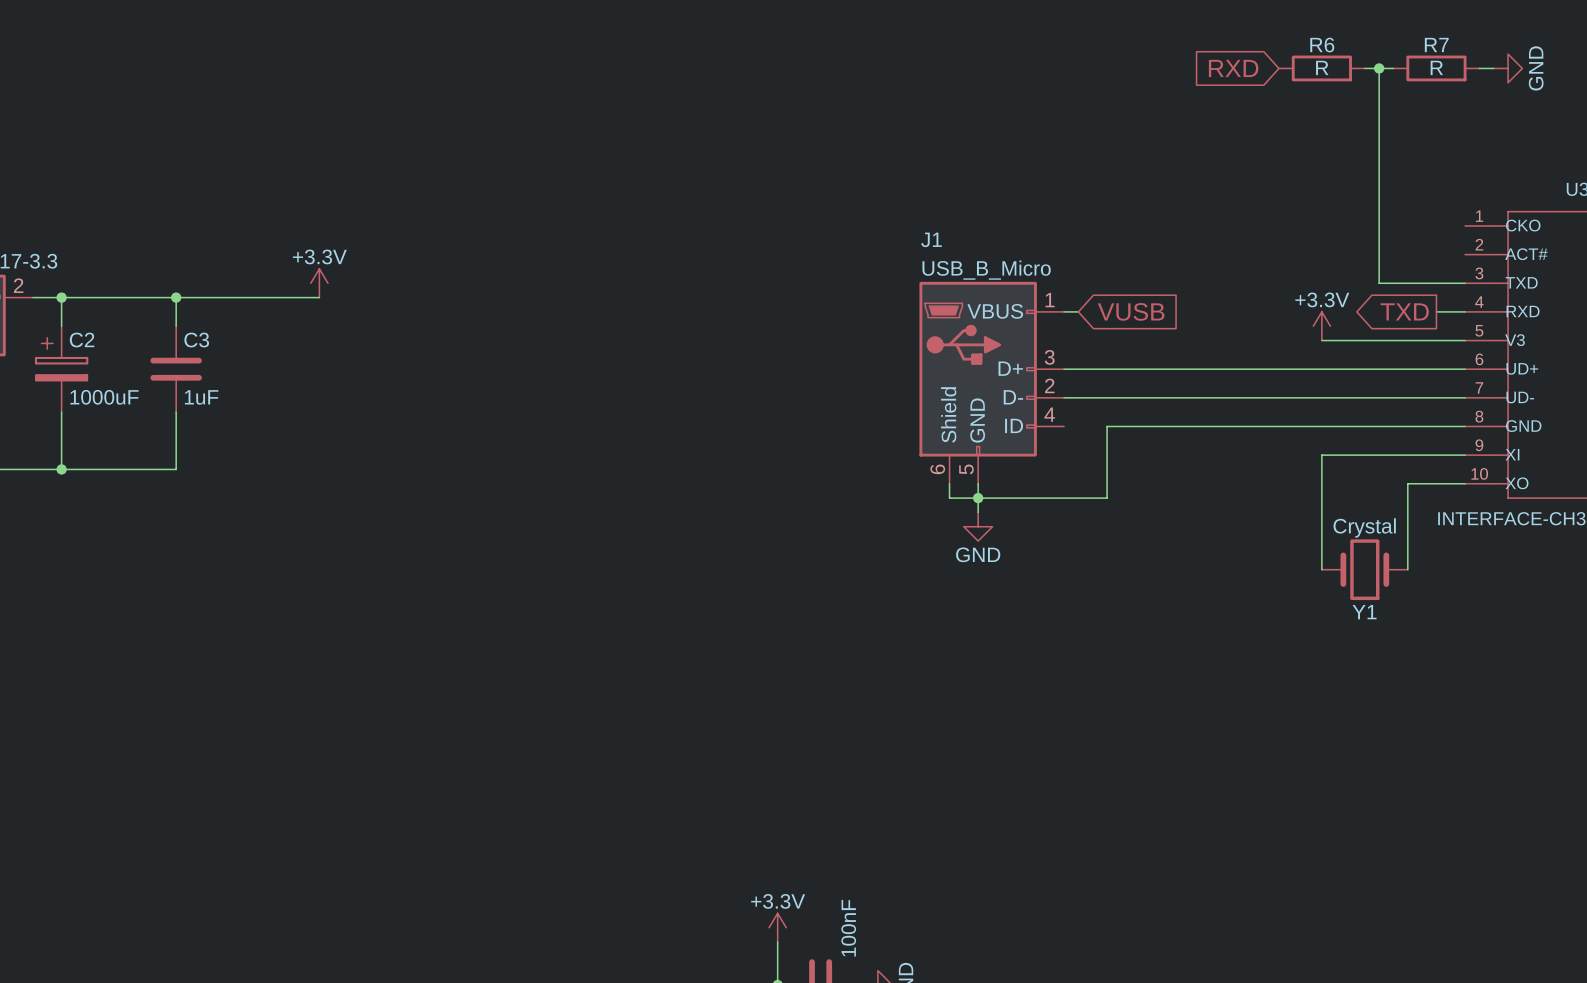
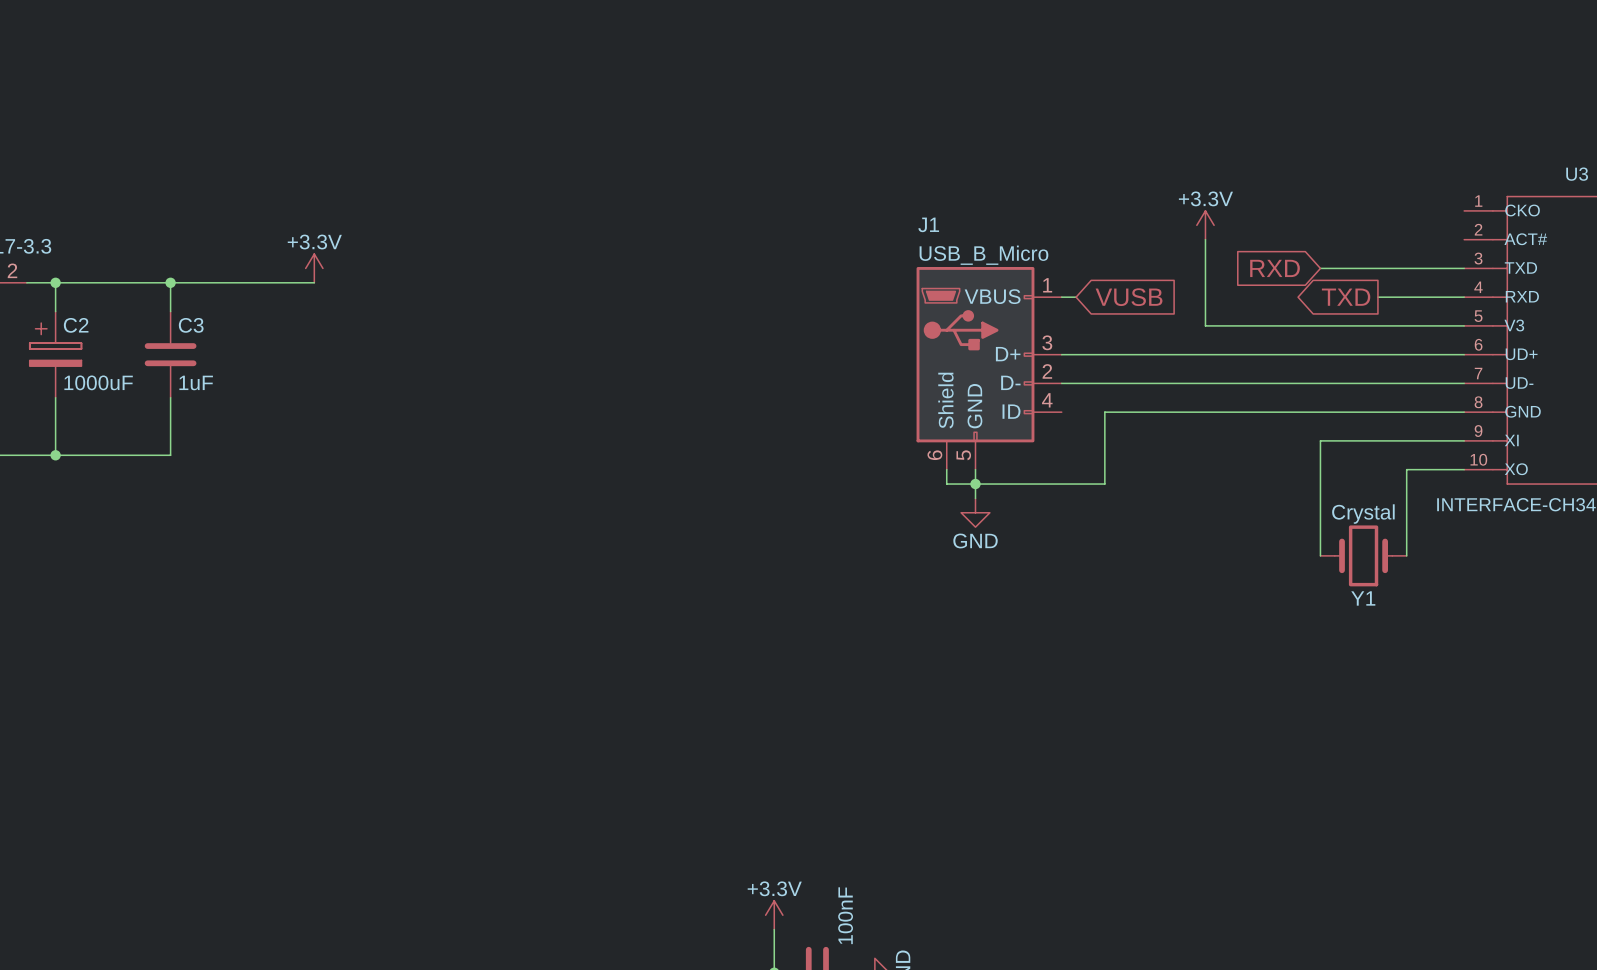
global label position: RXD (1233, 68) -> RXD (1275, 268)
R6: R (1321, 68) -> none
wire: (1364, 68) (1393, 68) -> none
wire: (1379, 68) (1379, 283) -> (1320, 268) (1377, 268)
junction: (1379, 68) -> none
R7: R (1436, 68) -> none
wire: (1479, 68) (1493, 68) -> none
power symbol: GND (1508, 68) -> none
wire: none -> (1205, 239) (1205, 325) (1320, 325)
wire: none -> (1377, 297) (1435, 297)
global label position: TXD (1404, 311) -> TXD (1346, 297)
power symbol position: +3.3V (1321, 326) -> +3.3V (1205, 225)

